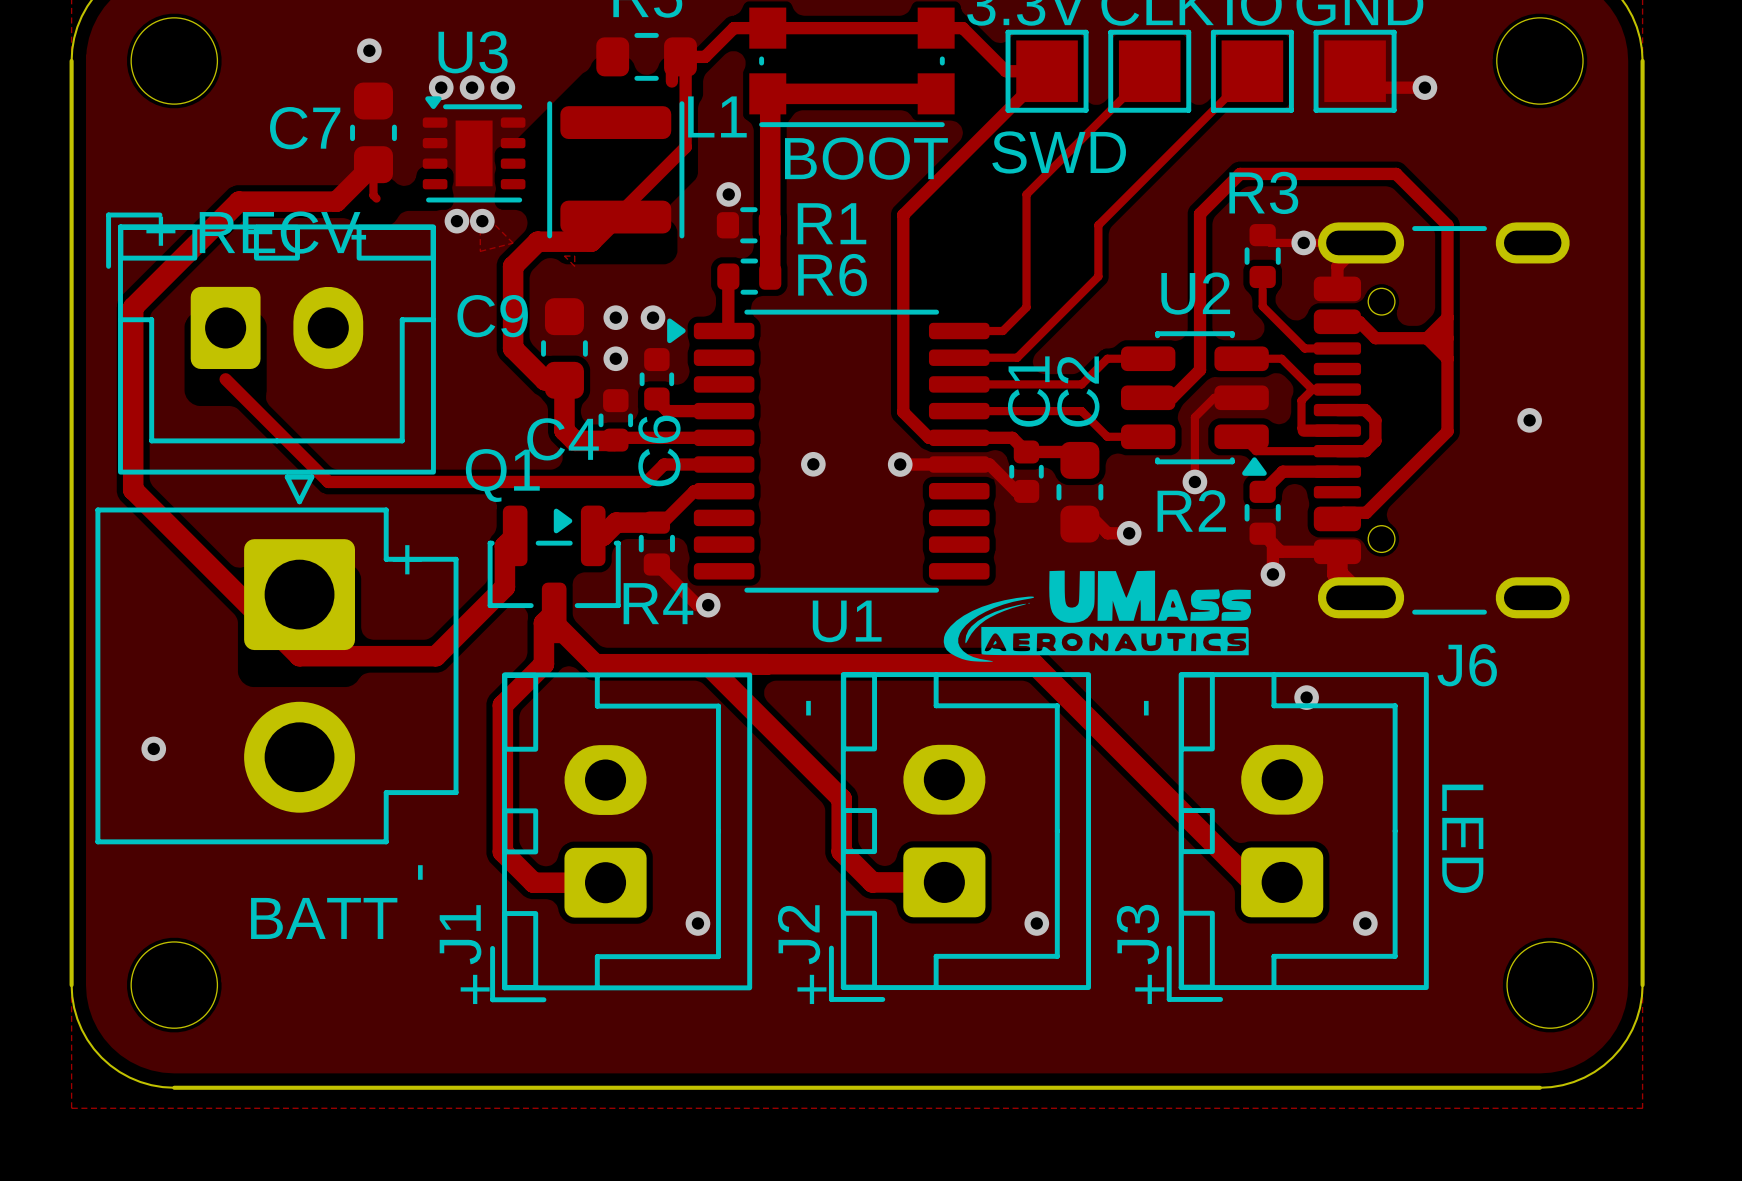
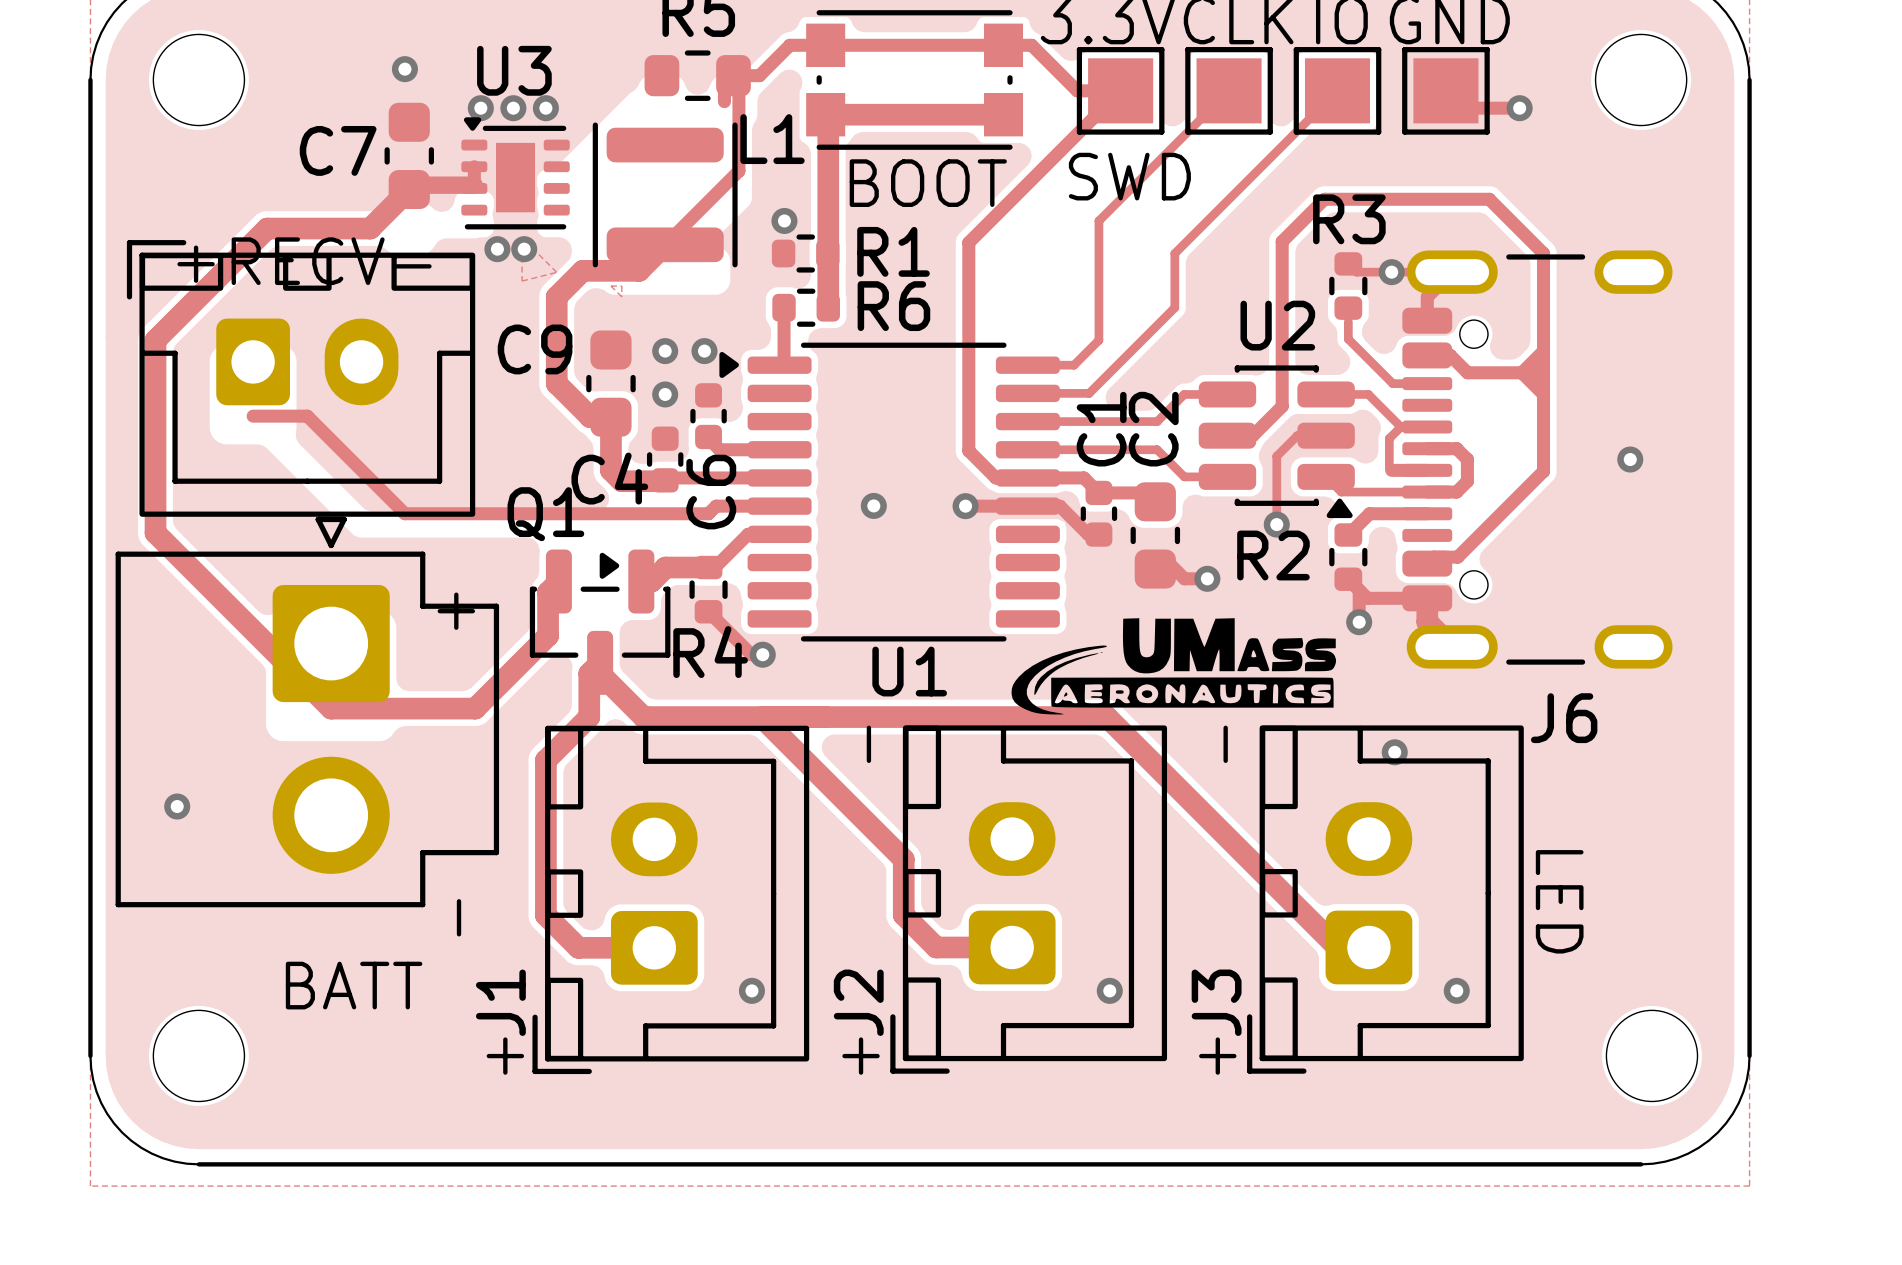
track: (373, 164) (373, 195) (376, 198) -> (409, 189) (413, 185) (474, 185) (474, 166)
track: (225, 379) (328, 481) (646, 481) (656, 471) -> (253, 416) (307, 416) (404, 513) (708, 513)

